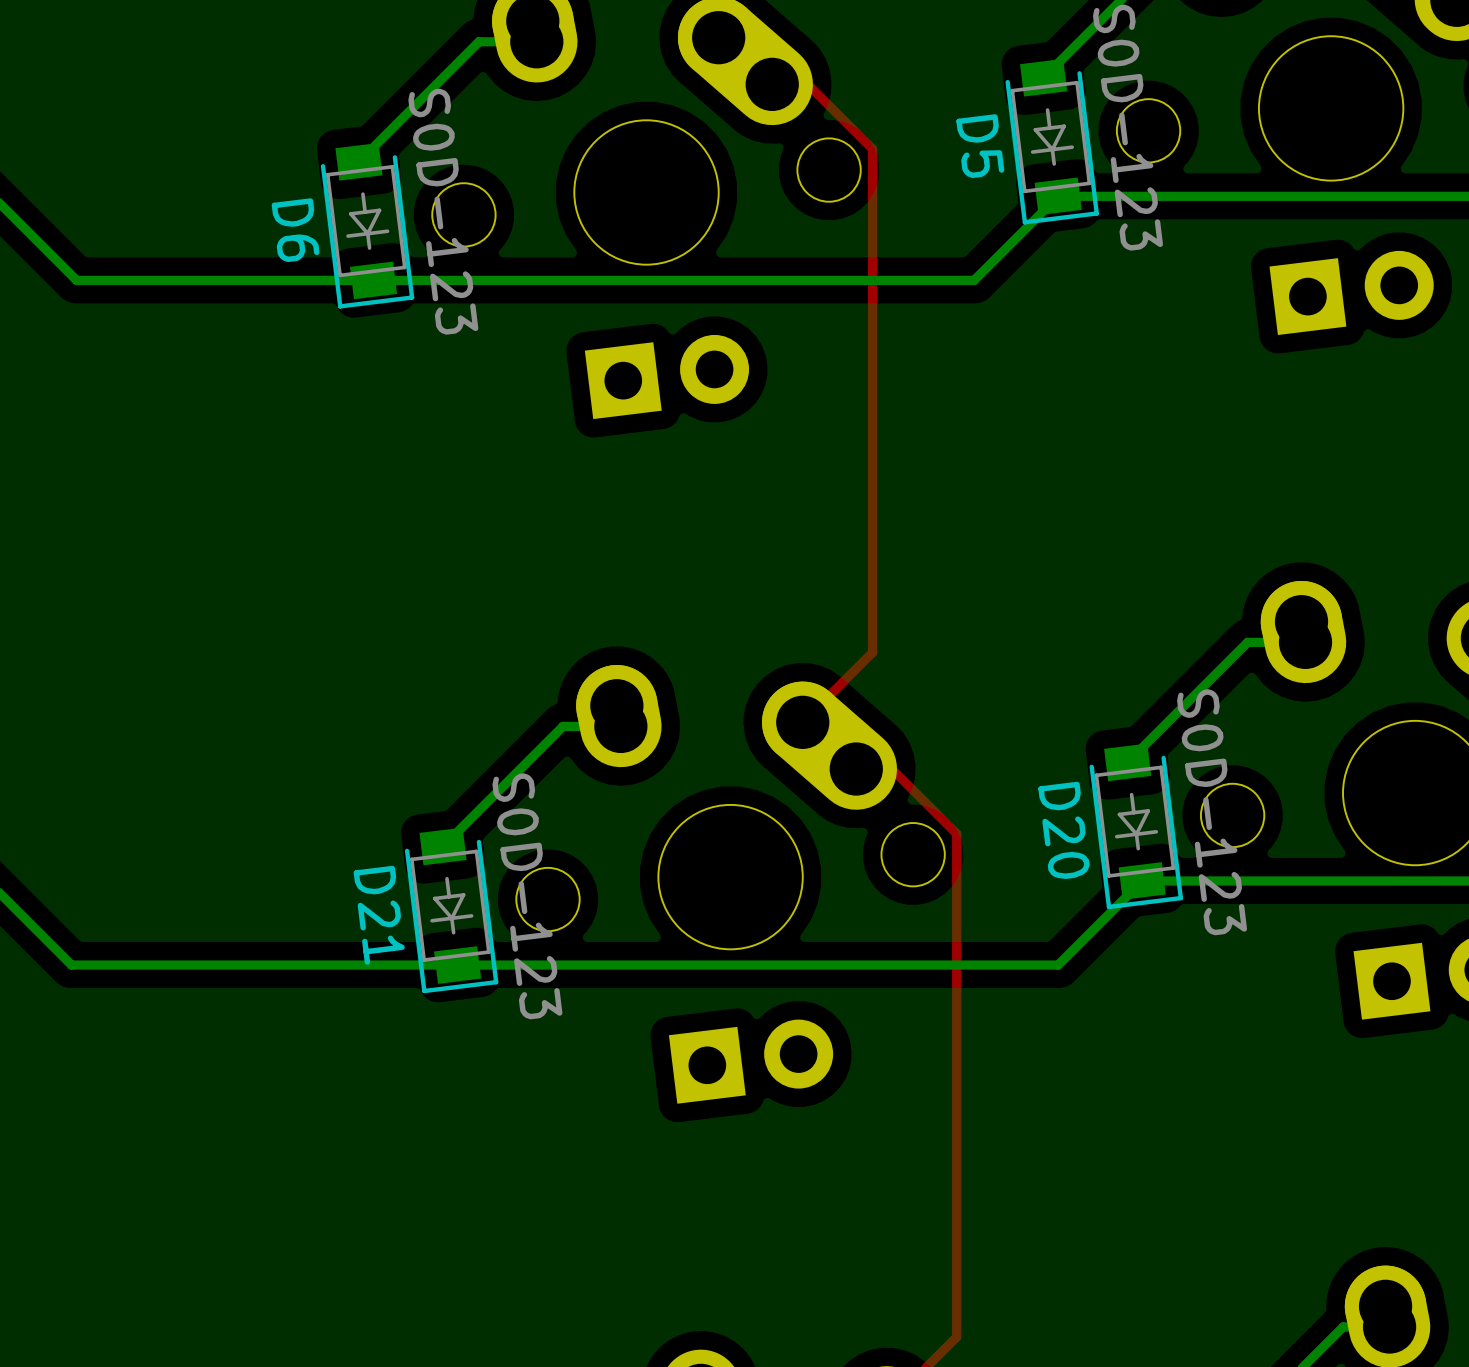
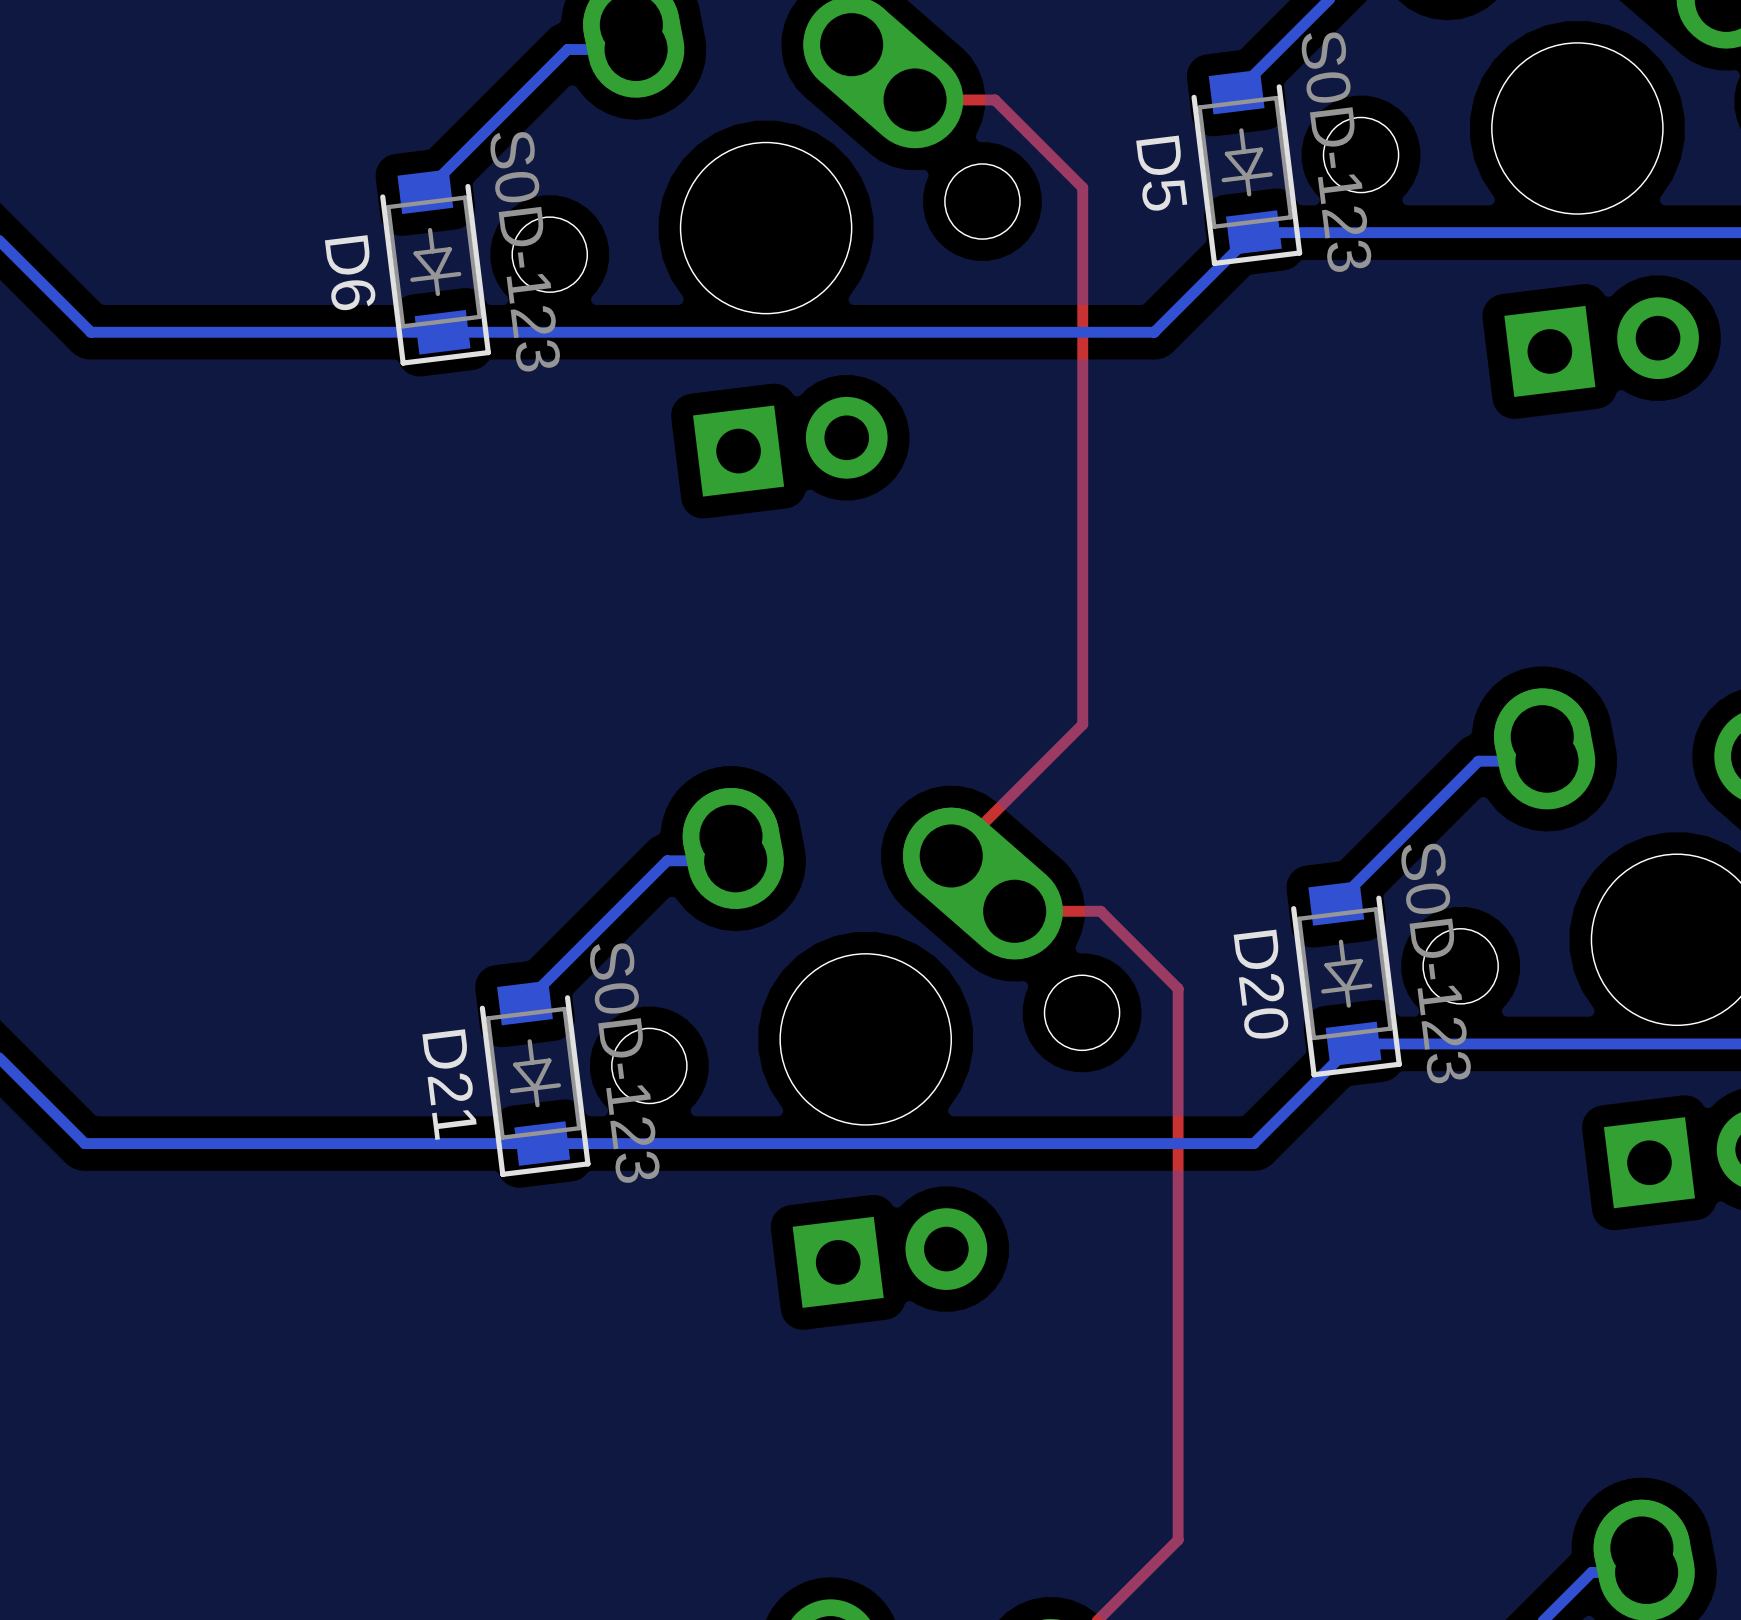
top track: (807, 84) (872, 149) (872, 652) -> (957, 99) (995, 99) (1082, 187) (1082, 724) (1034, 773)
top track: (891, 769) (956, 833) (956, 1337) -> (1056, 911) (1100, 911) (1178, 988) (1178, 1540) (1133, 1584)

